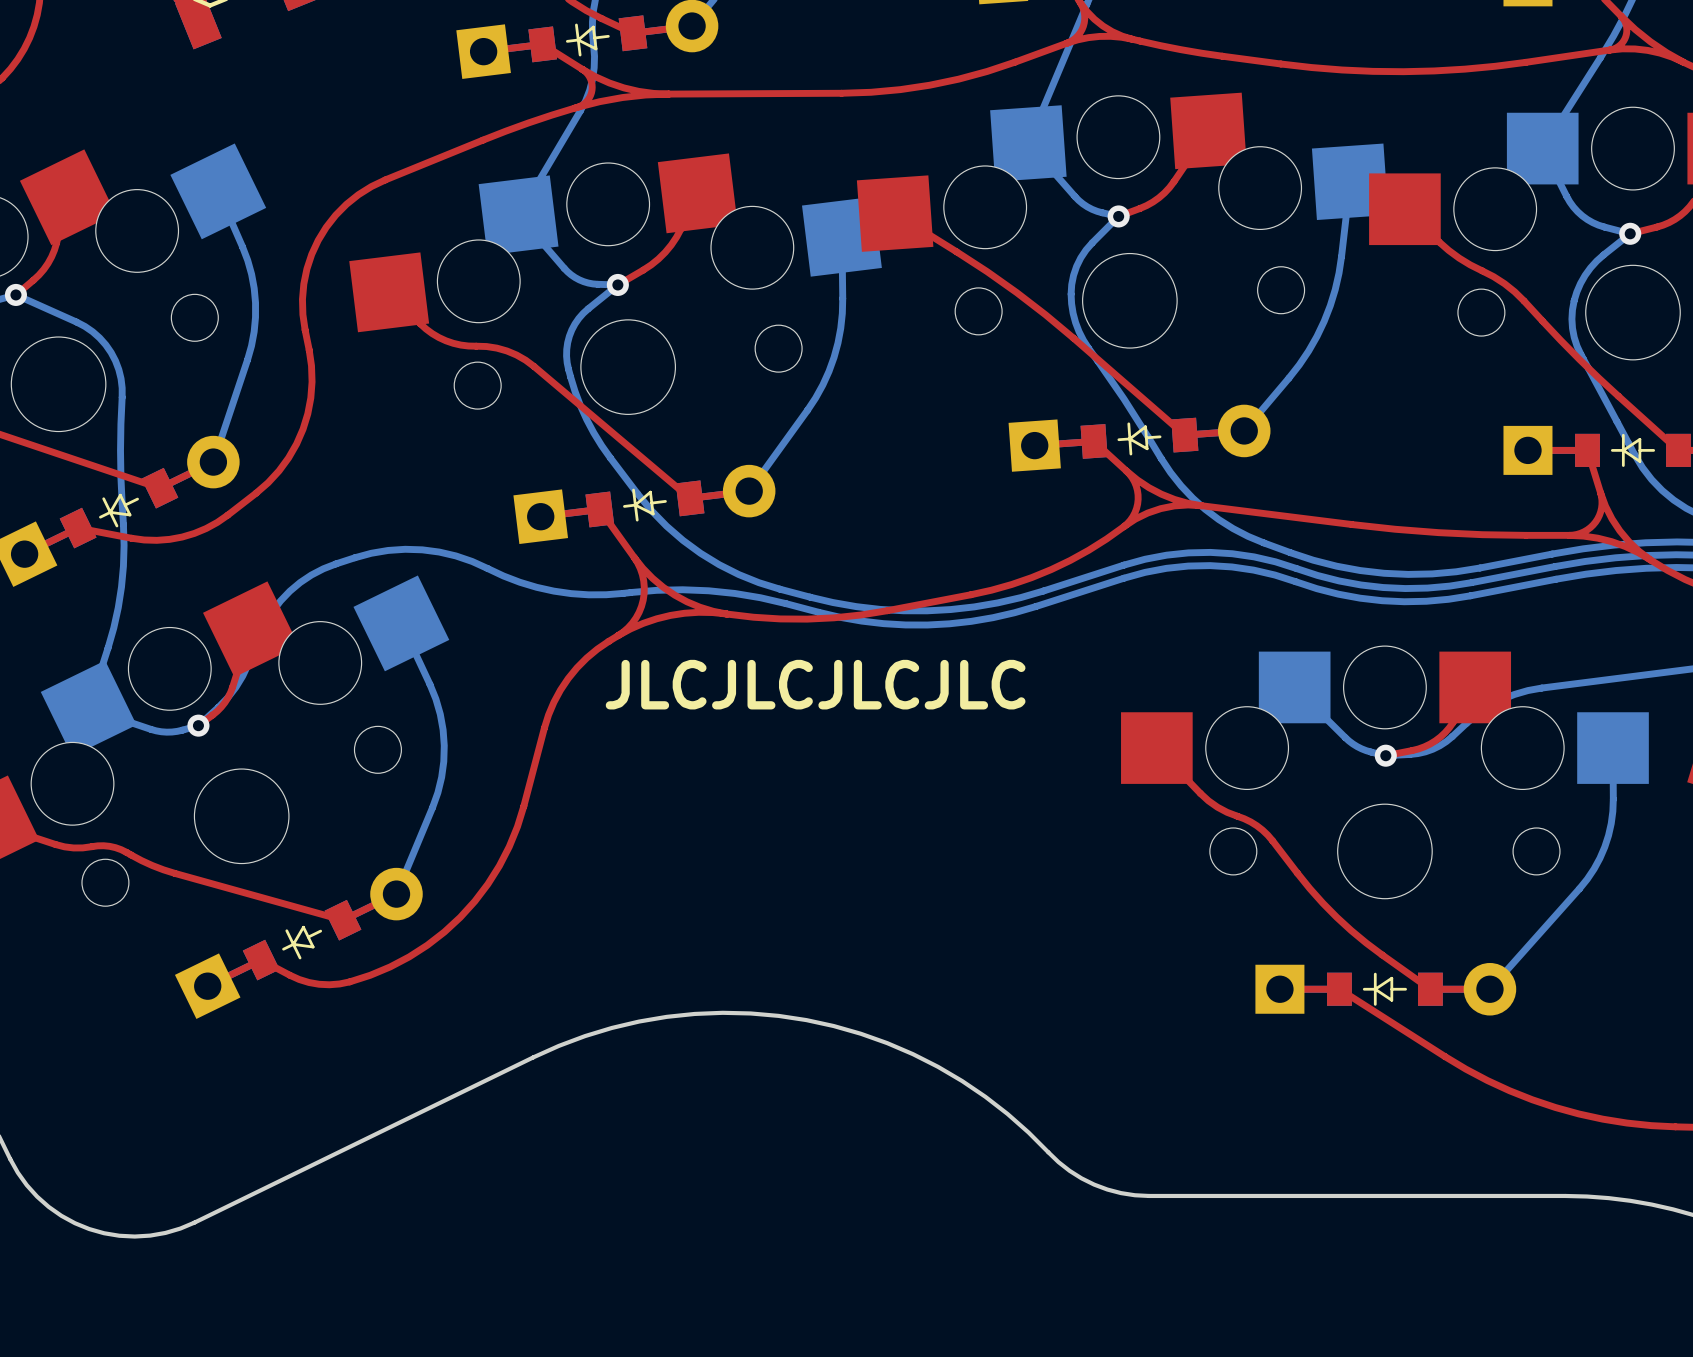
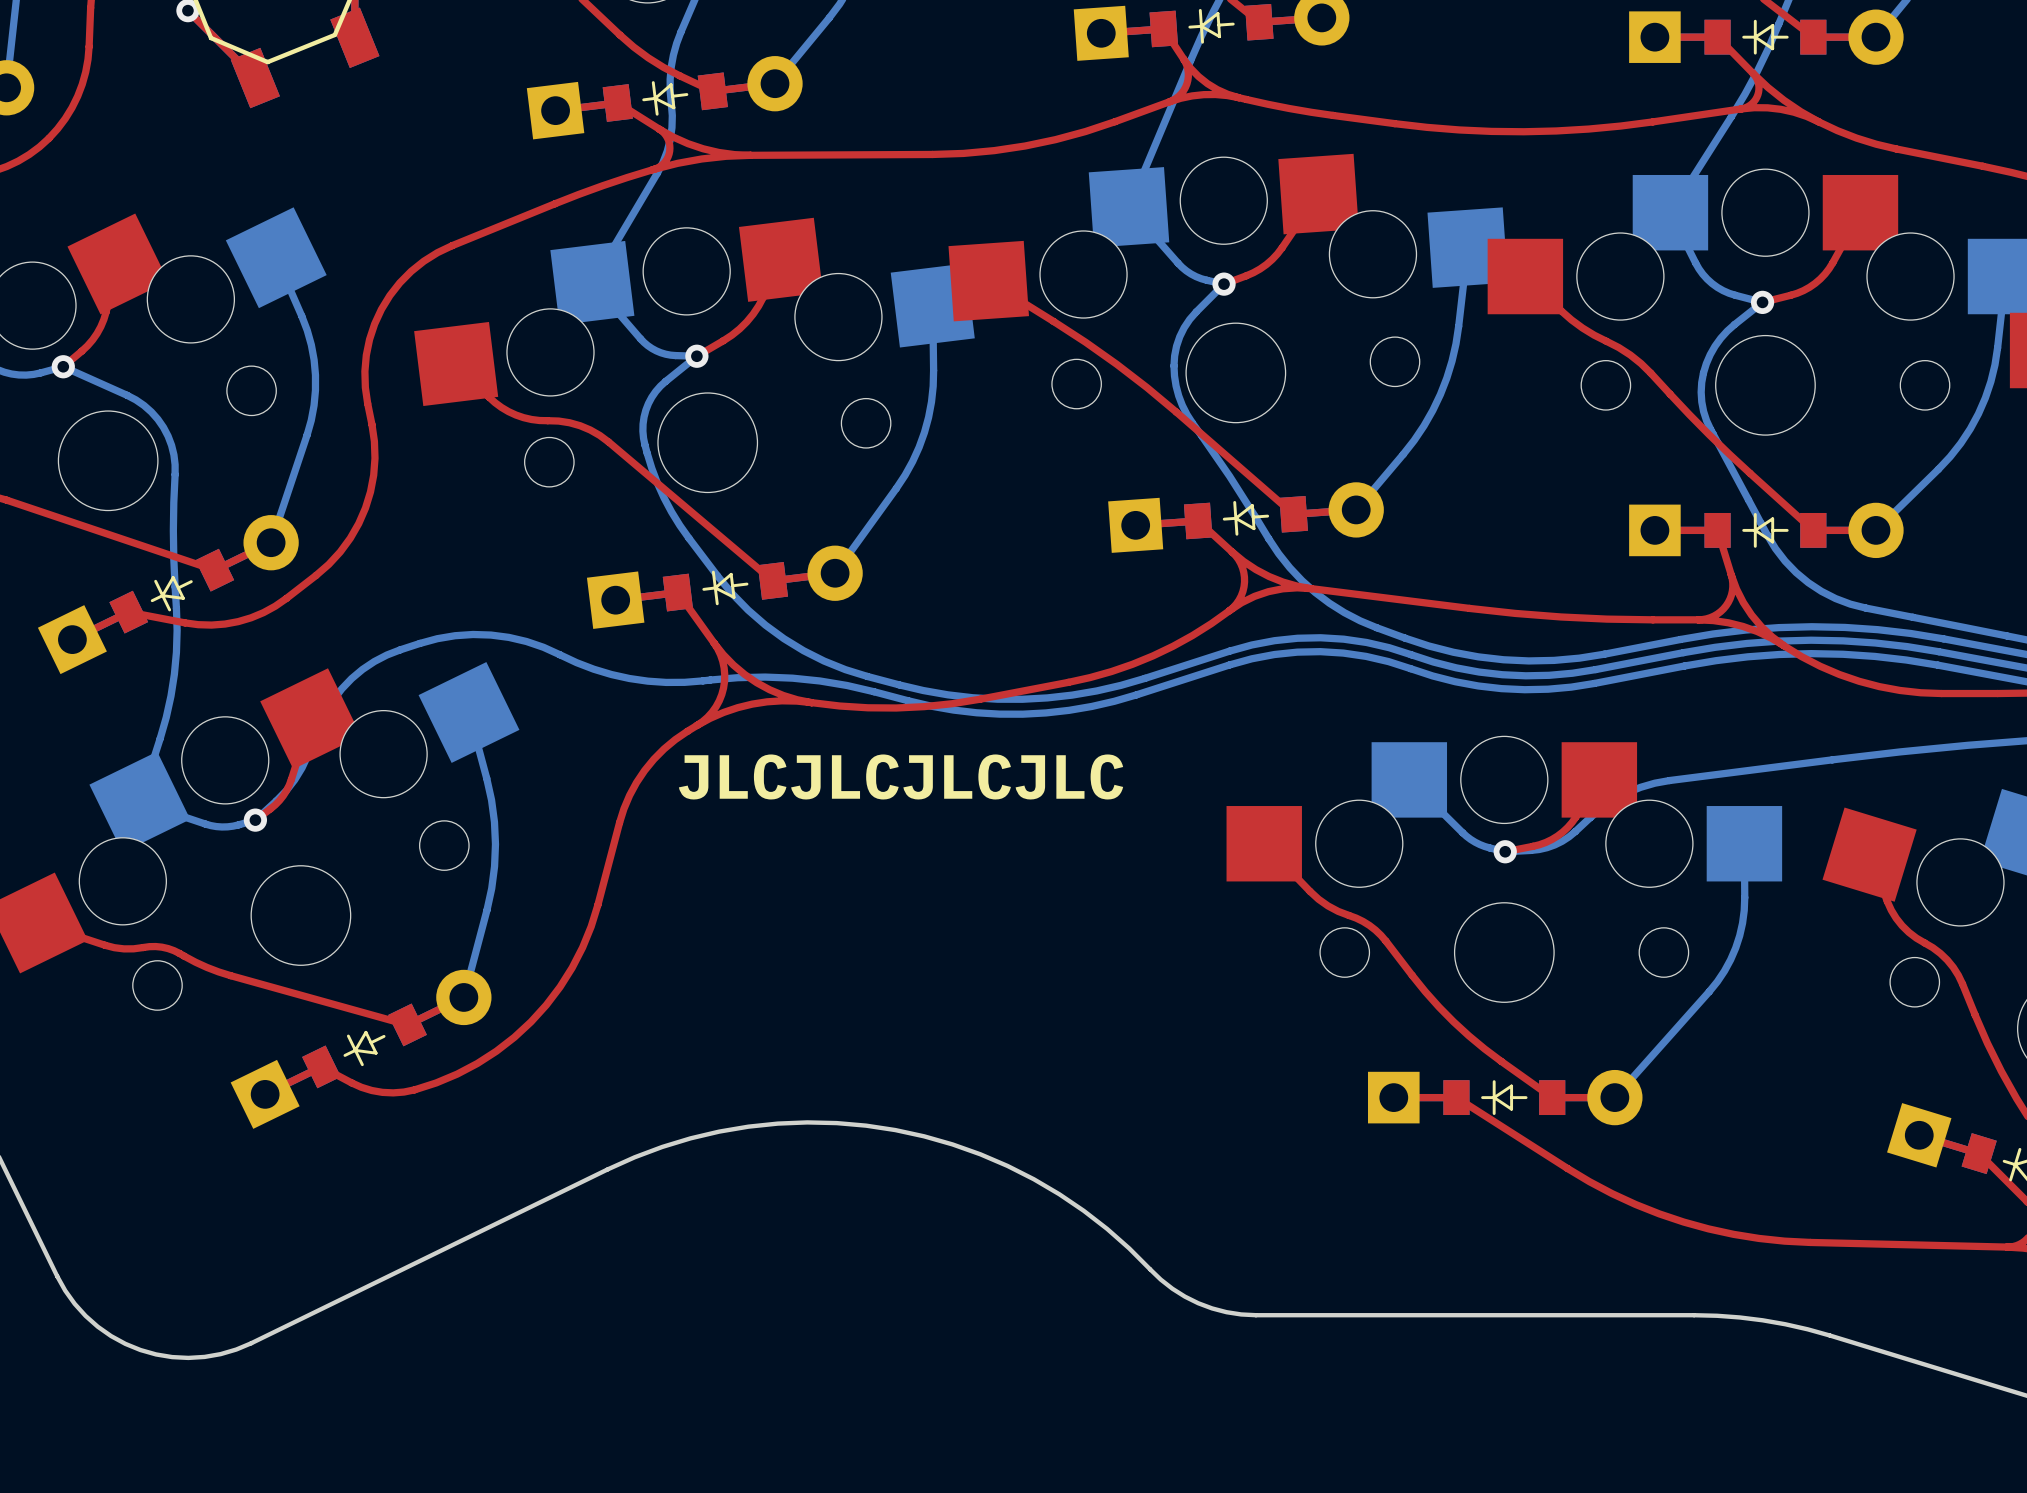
bottom track: (401, 623) (435, 699) (443, 729) (444, 745) (441, 777) (437, 792) (396, 894) -> (469, 712) (491, 800) (495, 844) (491, 888) (463, 997)

